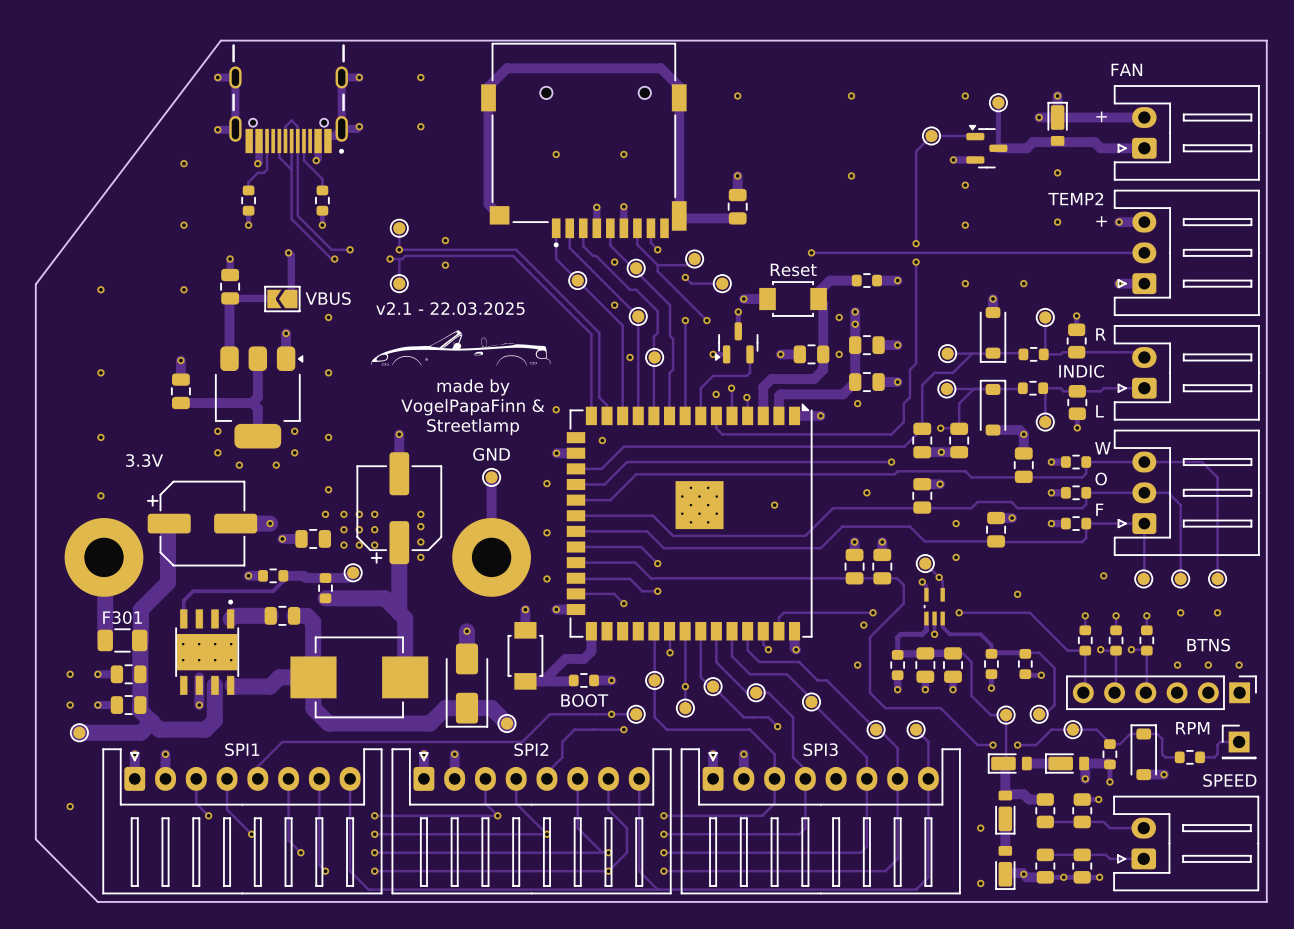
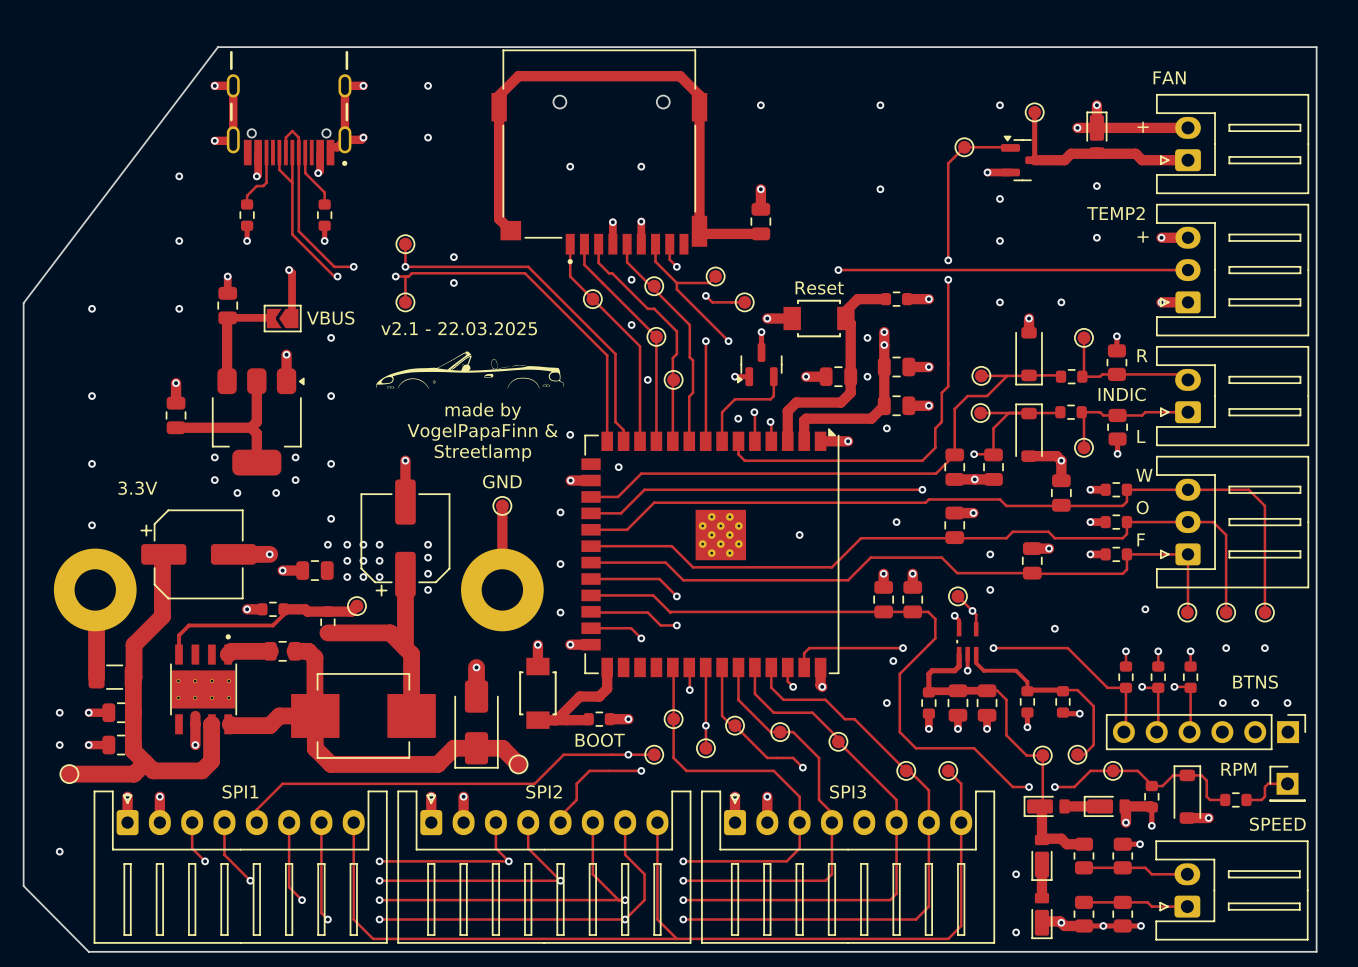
F301 name: F301 (122, 617) -> none

